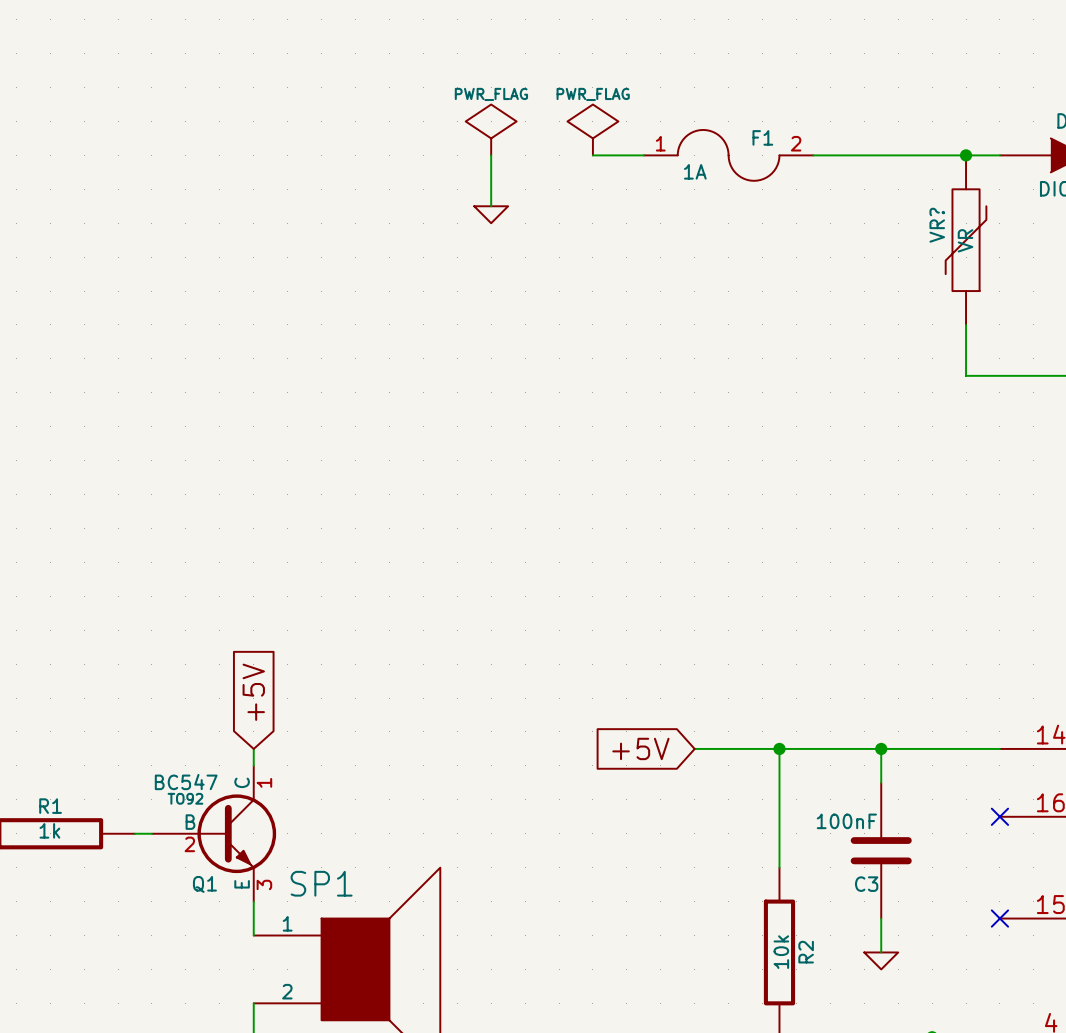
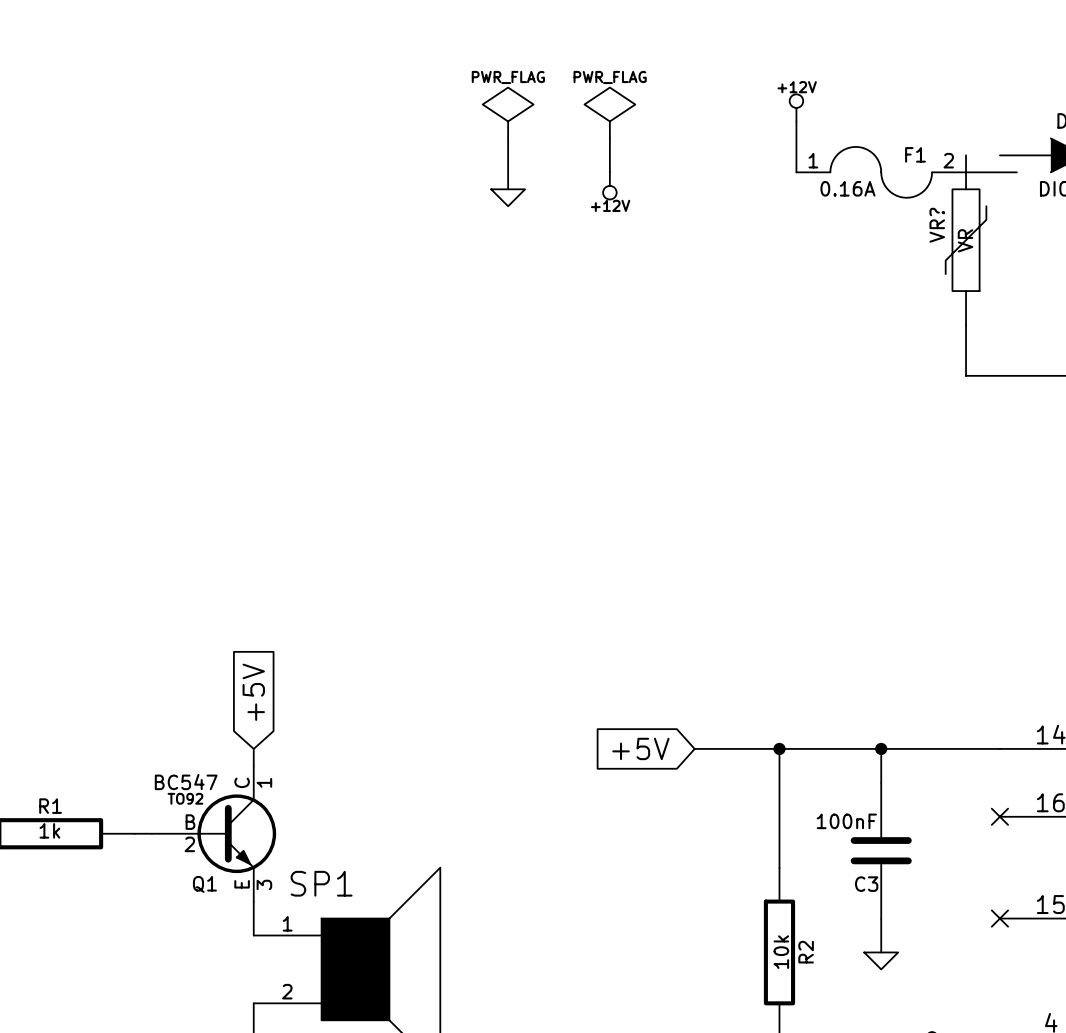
power symbol: none -> +12V (796, 107)
wire: none -> (796, 121) (796, 172)
power symbol position: PWR_FLAG (491, 129) -> PWR_FLAG (508, 112)
power symbol position: PWR_FLAG (592, 129) -> PWR_FLAG (609, 112)
wire: none -> (609, 138) (609, 172)
wire: (491, 155) (491, 206) -> (508, 138) (508, 189)
wire: (592, 155) (643, 155) -> none
F1 position: (728, 155) -> (881, 172)
wire: (813, 155) (999, 155) -> none
junction: (966, 155) -> none
F1 value: 1A (695, 171) -> 0.16A (847, 188)
wire: none -> (966, 172) (1016, 172)
power symbol: none -> +12V (609, 185)
power symbol position: (491, 214) -> (508, 197)

